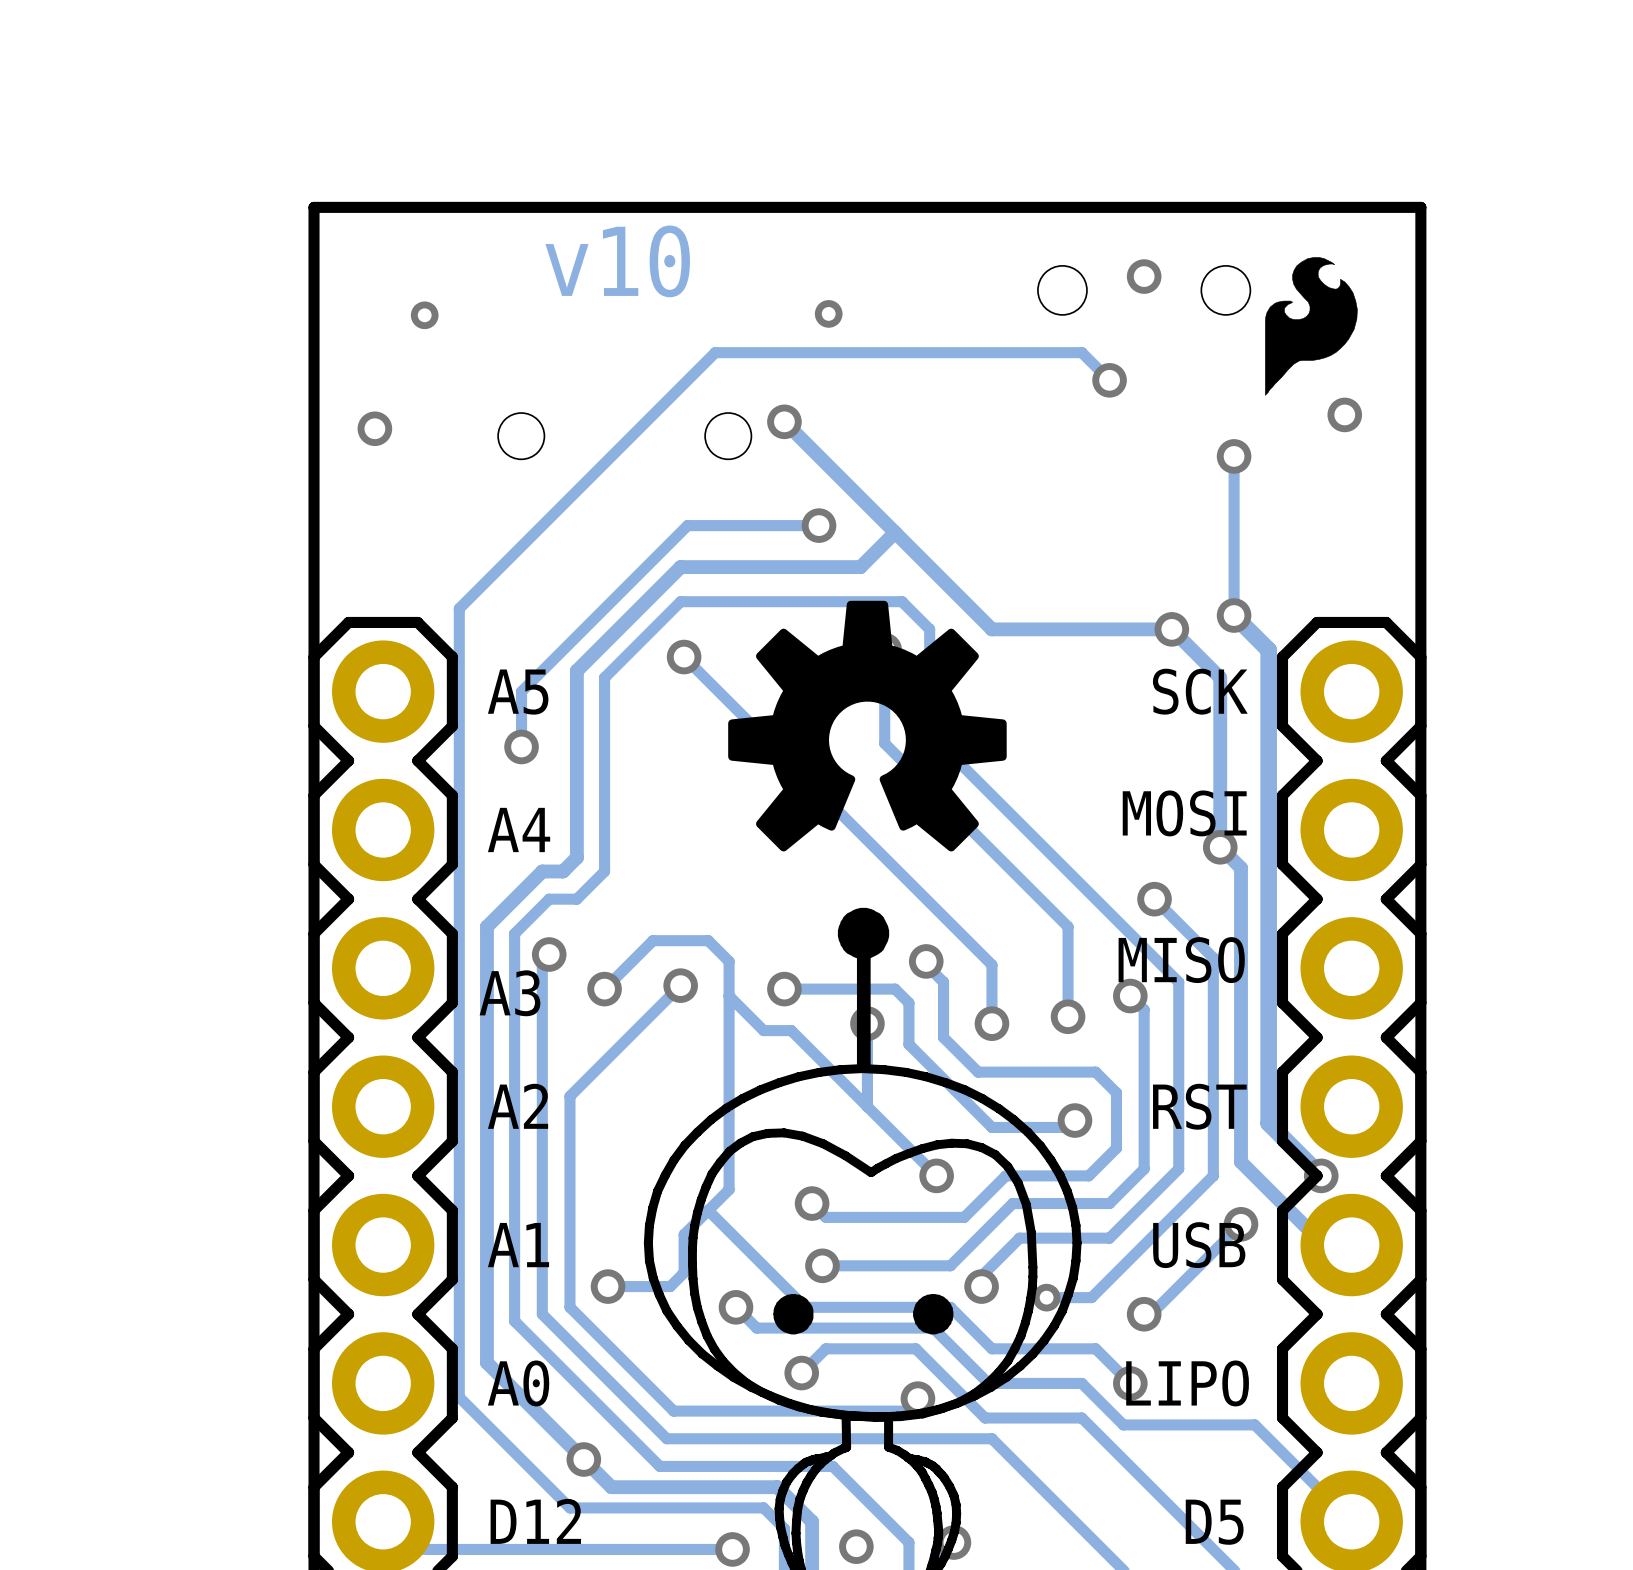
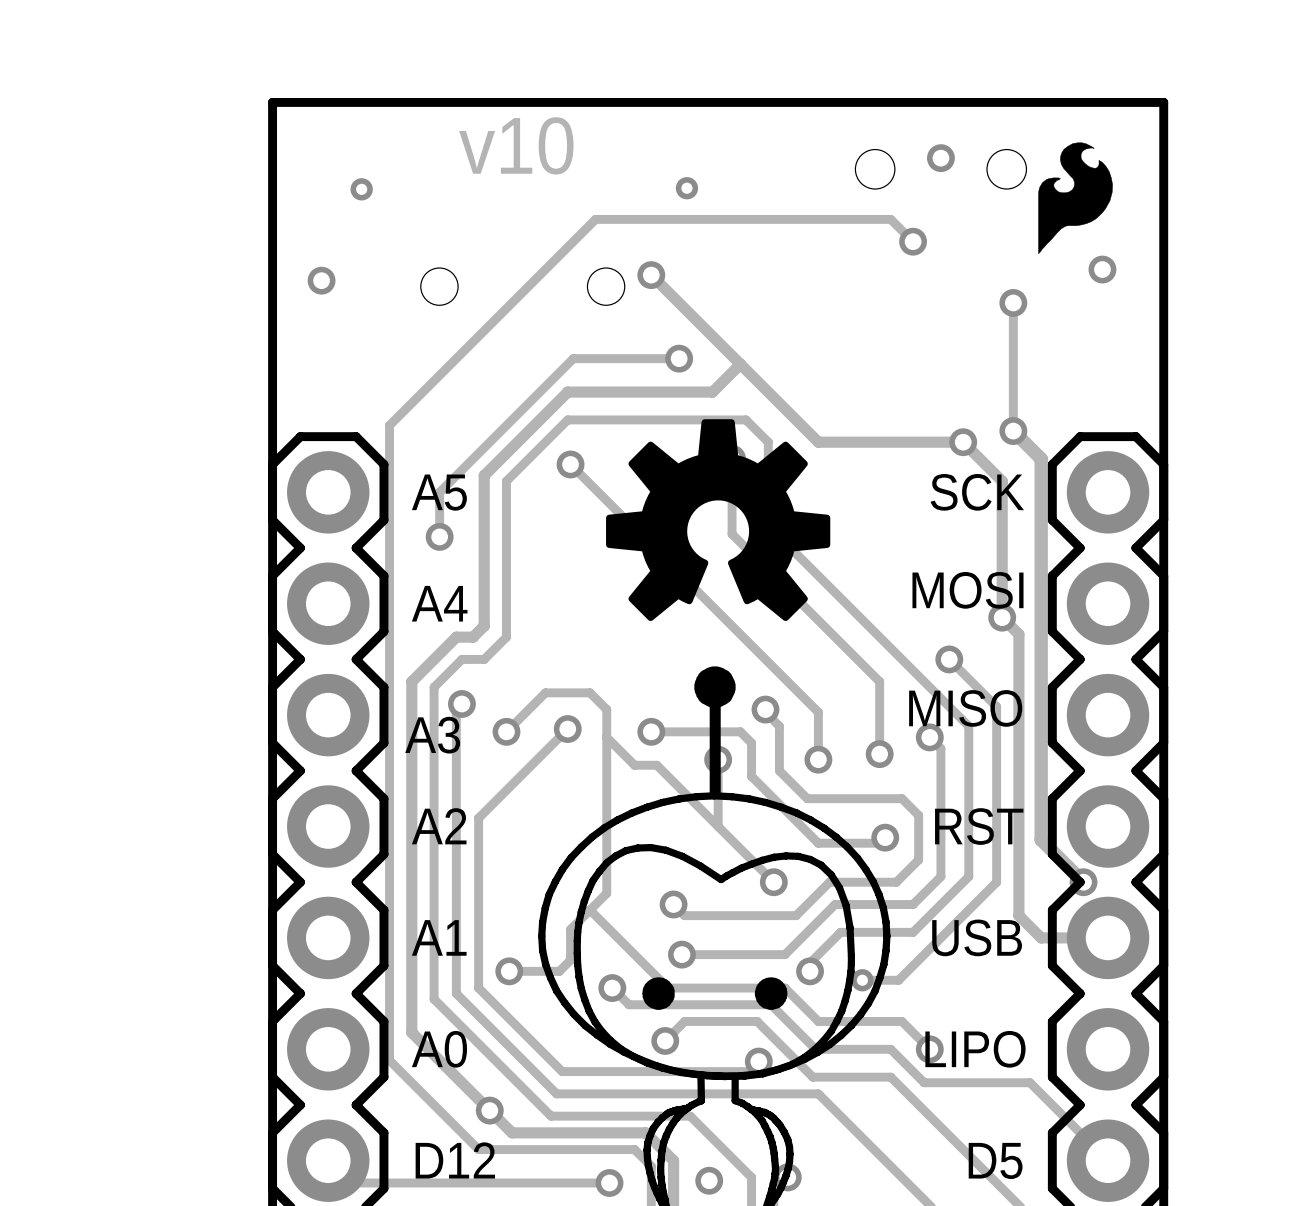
track: (1241, 1162) (1324, 1245) -> (1018, 871) (1018, 915) (1041, 937) (1085, 937)
track: (1241, 1224) (1151, 1314) (1144, 1314) -> none
via: (1241, 1224) -> none
via: (1144, 1314) -> none

